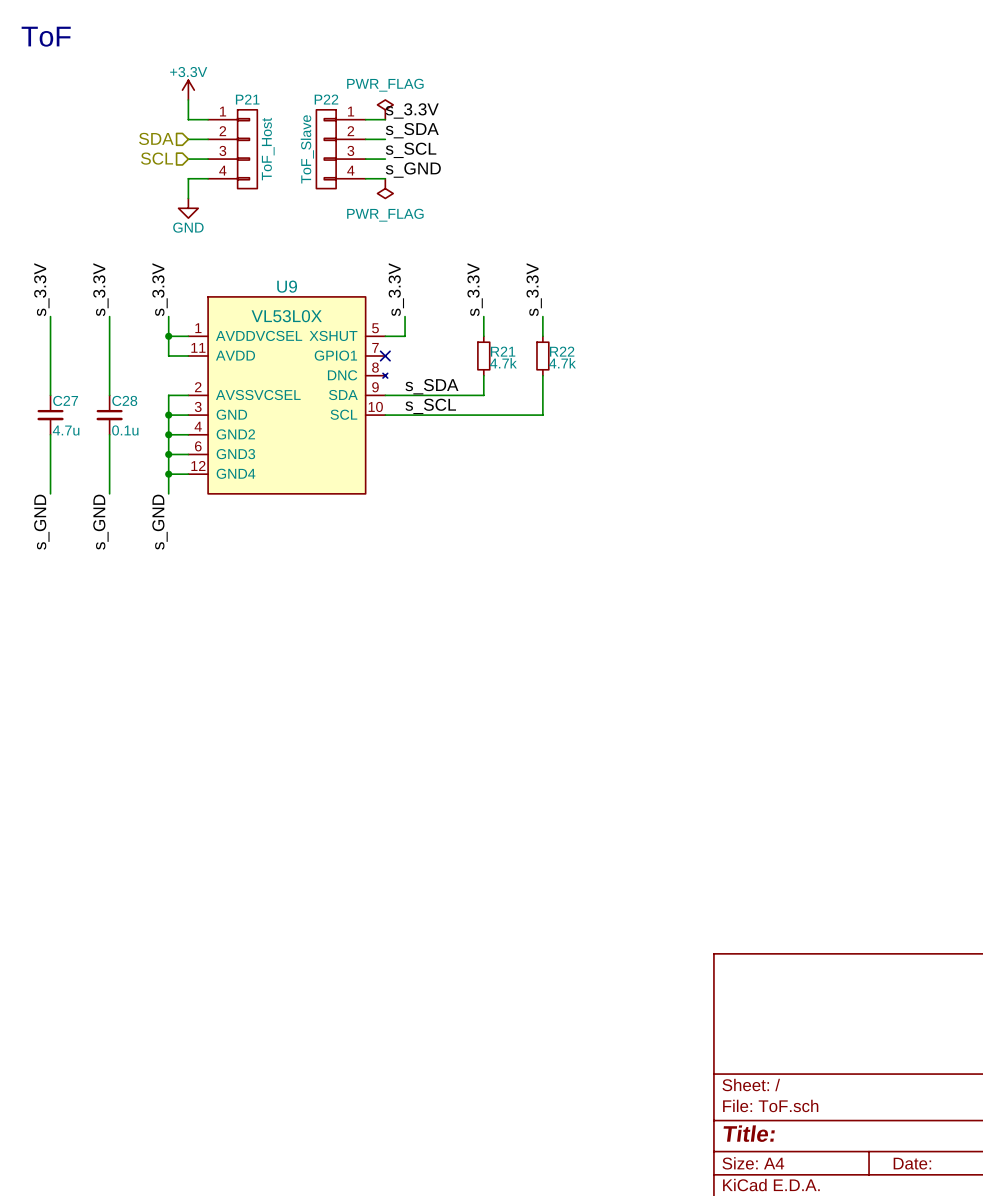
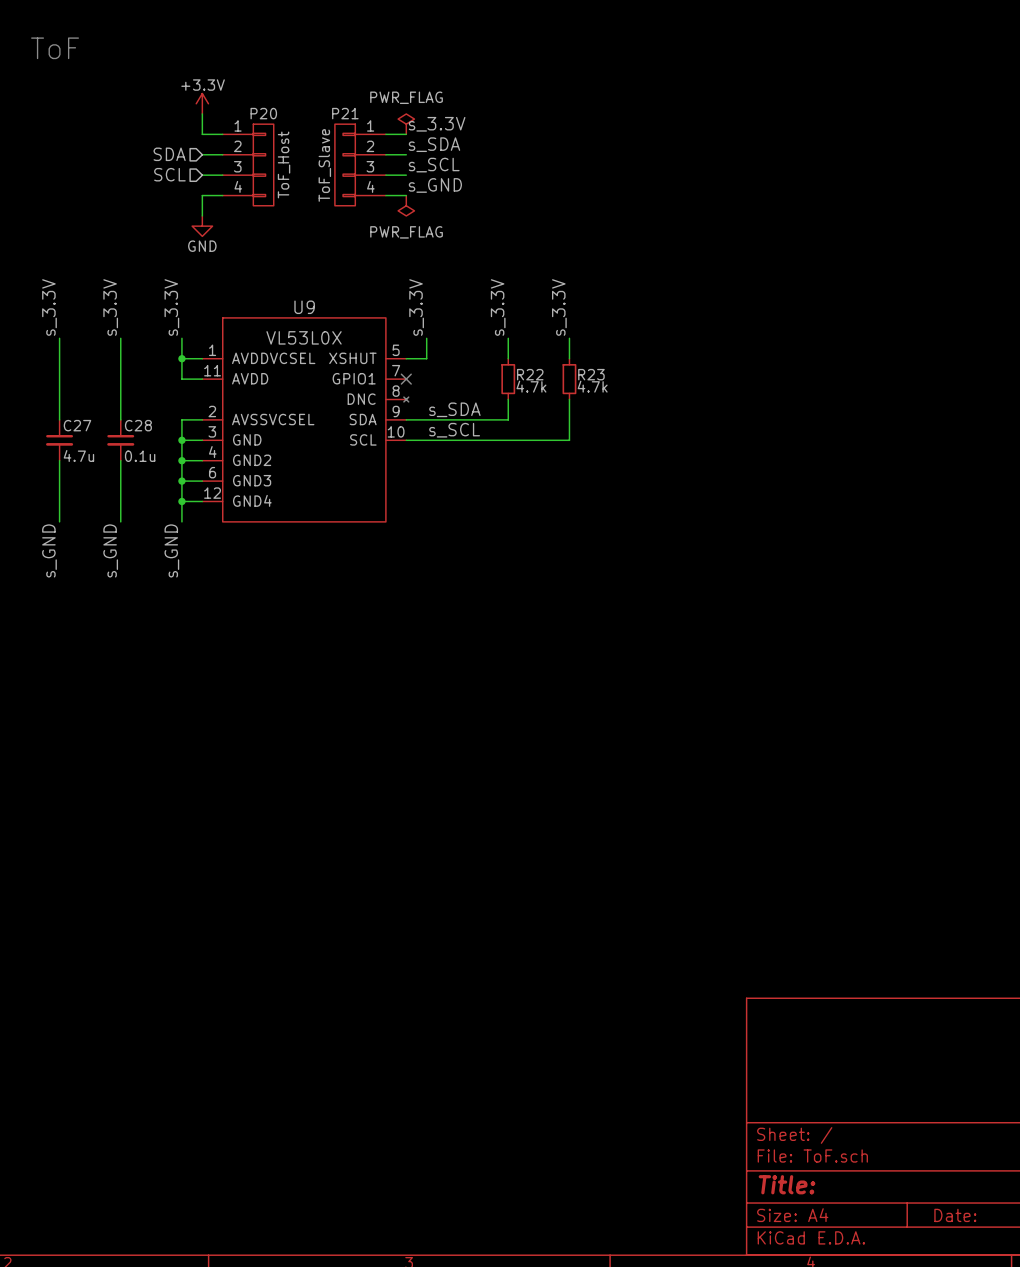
P21 name: P21 (247, 99) -> P20 (263, 113)
P22 name: P22 (326, 99) -> P21 (345, 113)
R21 name: R21 (503, 351) -> R22 (530, 374)
R22 name: R22 (562, 351) -> R23 (591, 374)

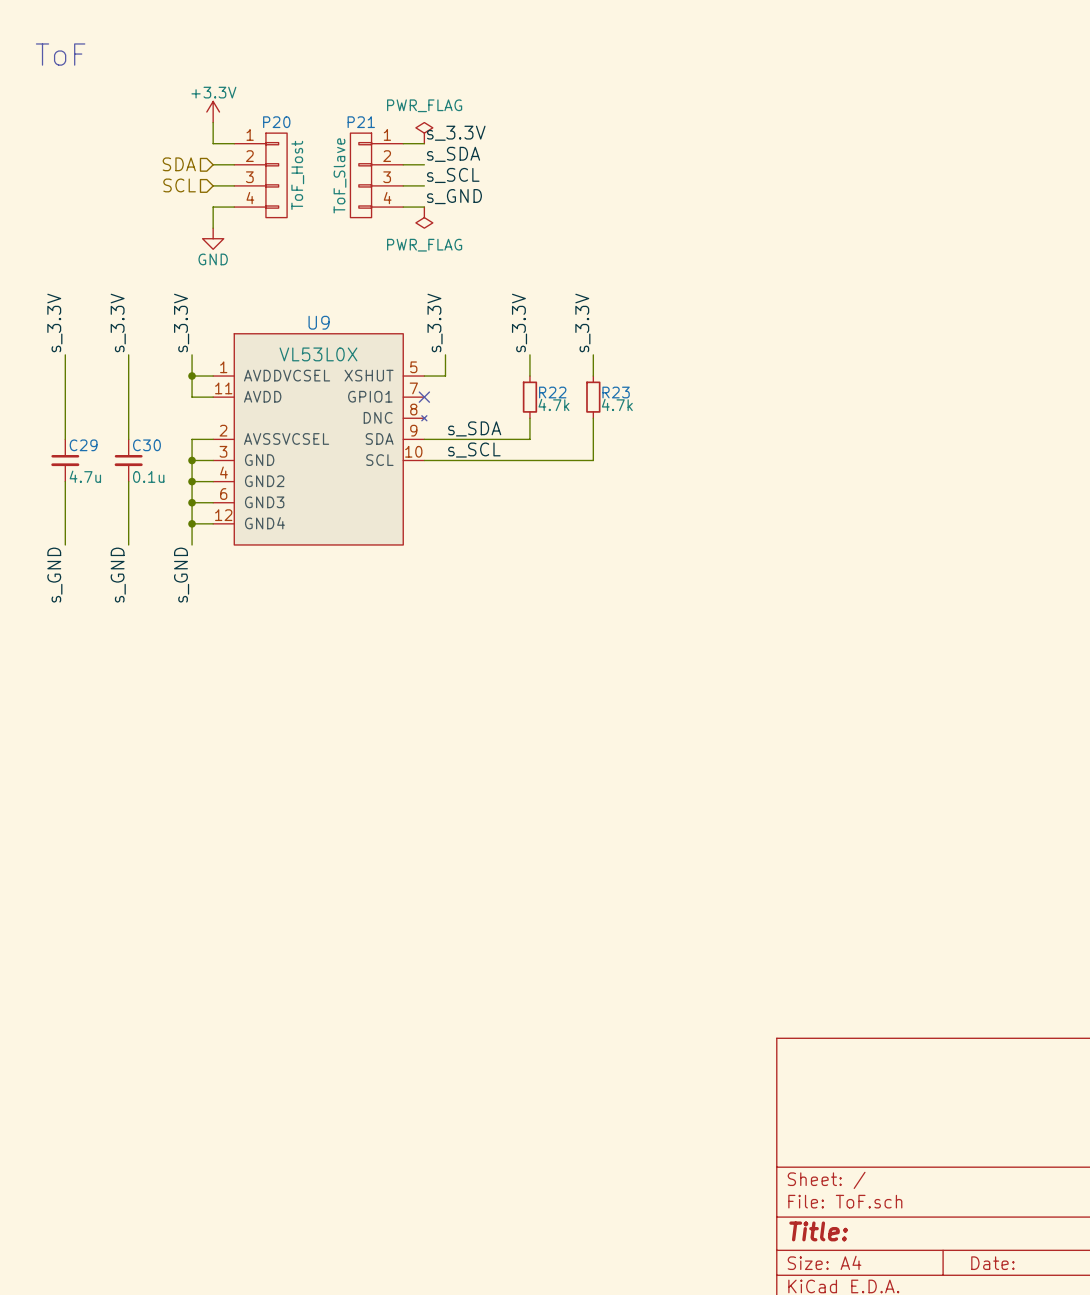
C27 name: C27 (77, 425) -> C29 (83, 445)
C28 name: C28 (138, 425) -> C30 (146, 445)

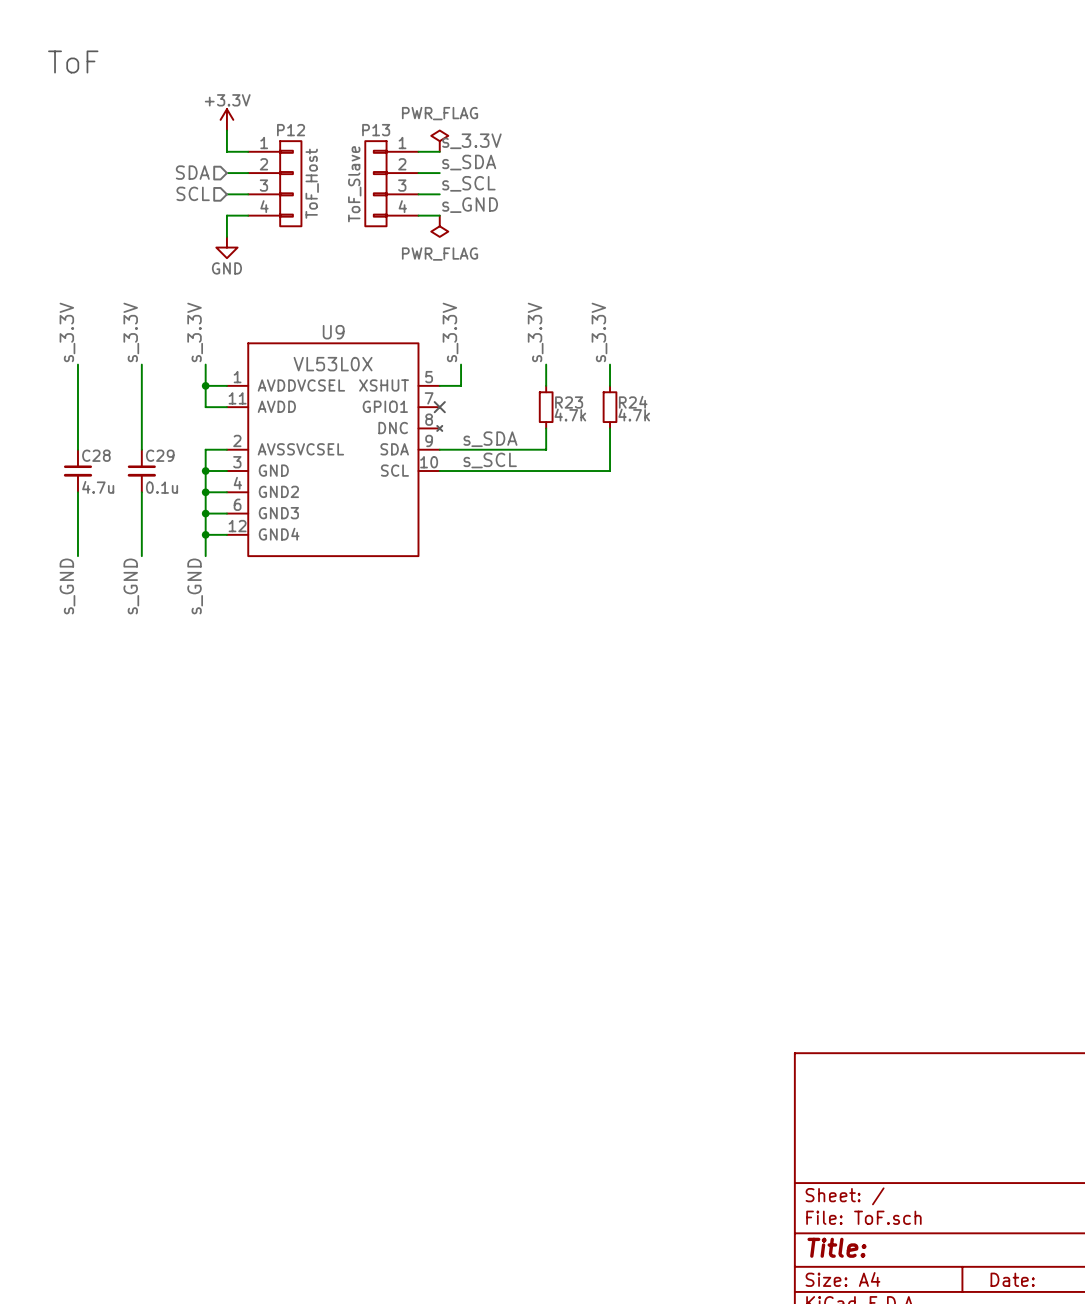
P20 name: P20 (276, 122) -> P12 (291, 130)
P21 name: P21 (361, 122) -> P13 (376, 130)
R22 name: R22 (552, 392) -> R23 (569, 402)
R23 name: R23 (616, 392) -> R24 (633, 402)
C29 name: C29 (83, 445) -> C28 (96, 455)
C30 name: C30 (146, 445) -> C29 (160, 455)

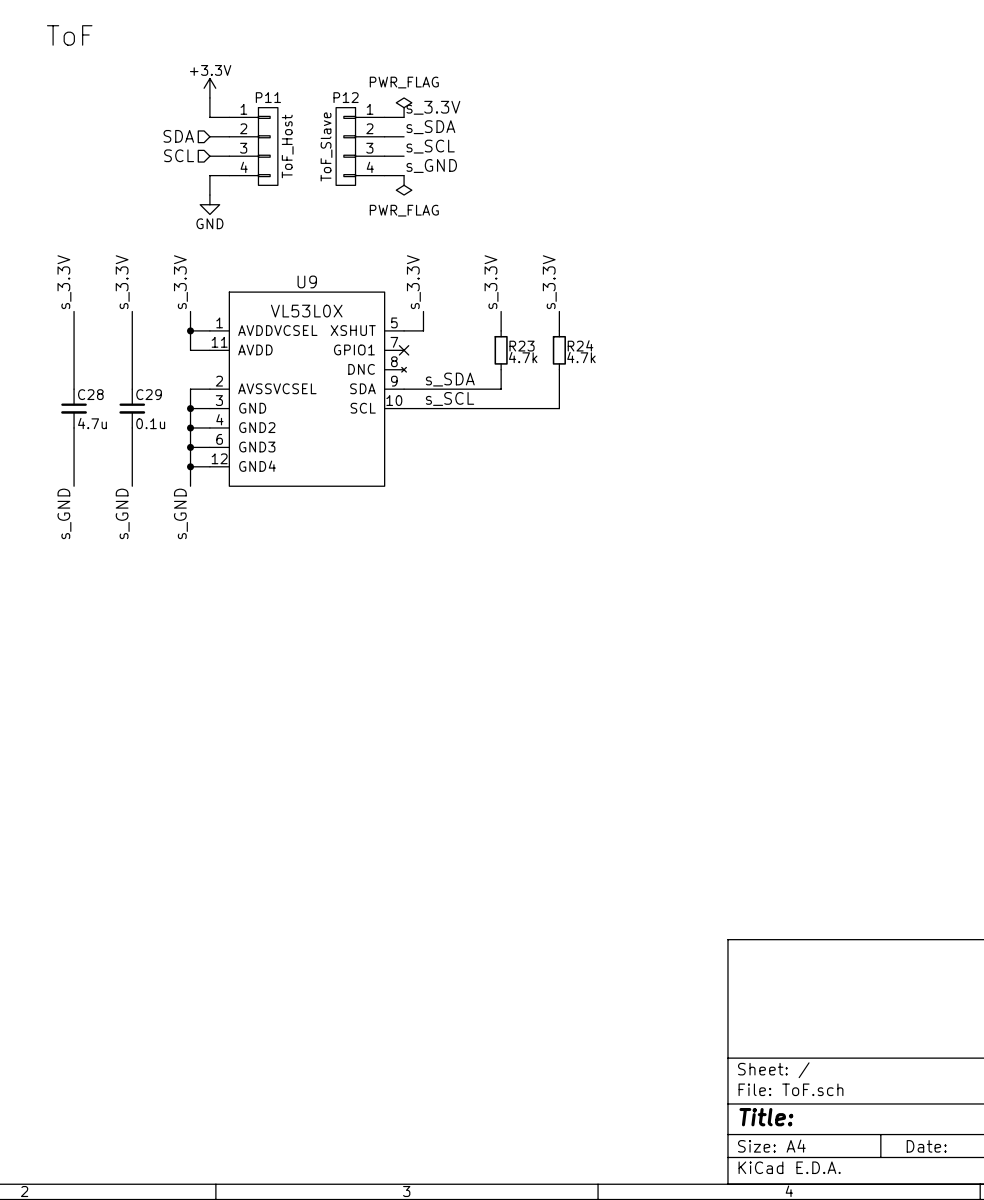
P12 name: P12 (291, 130) -> P11 (268, 97)
P13 name: P13 (376, 130) -> P12 (346, 97)

